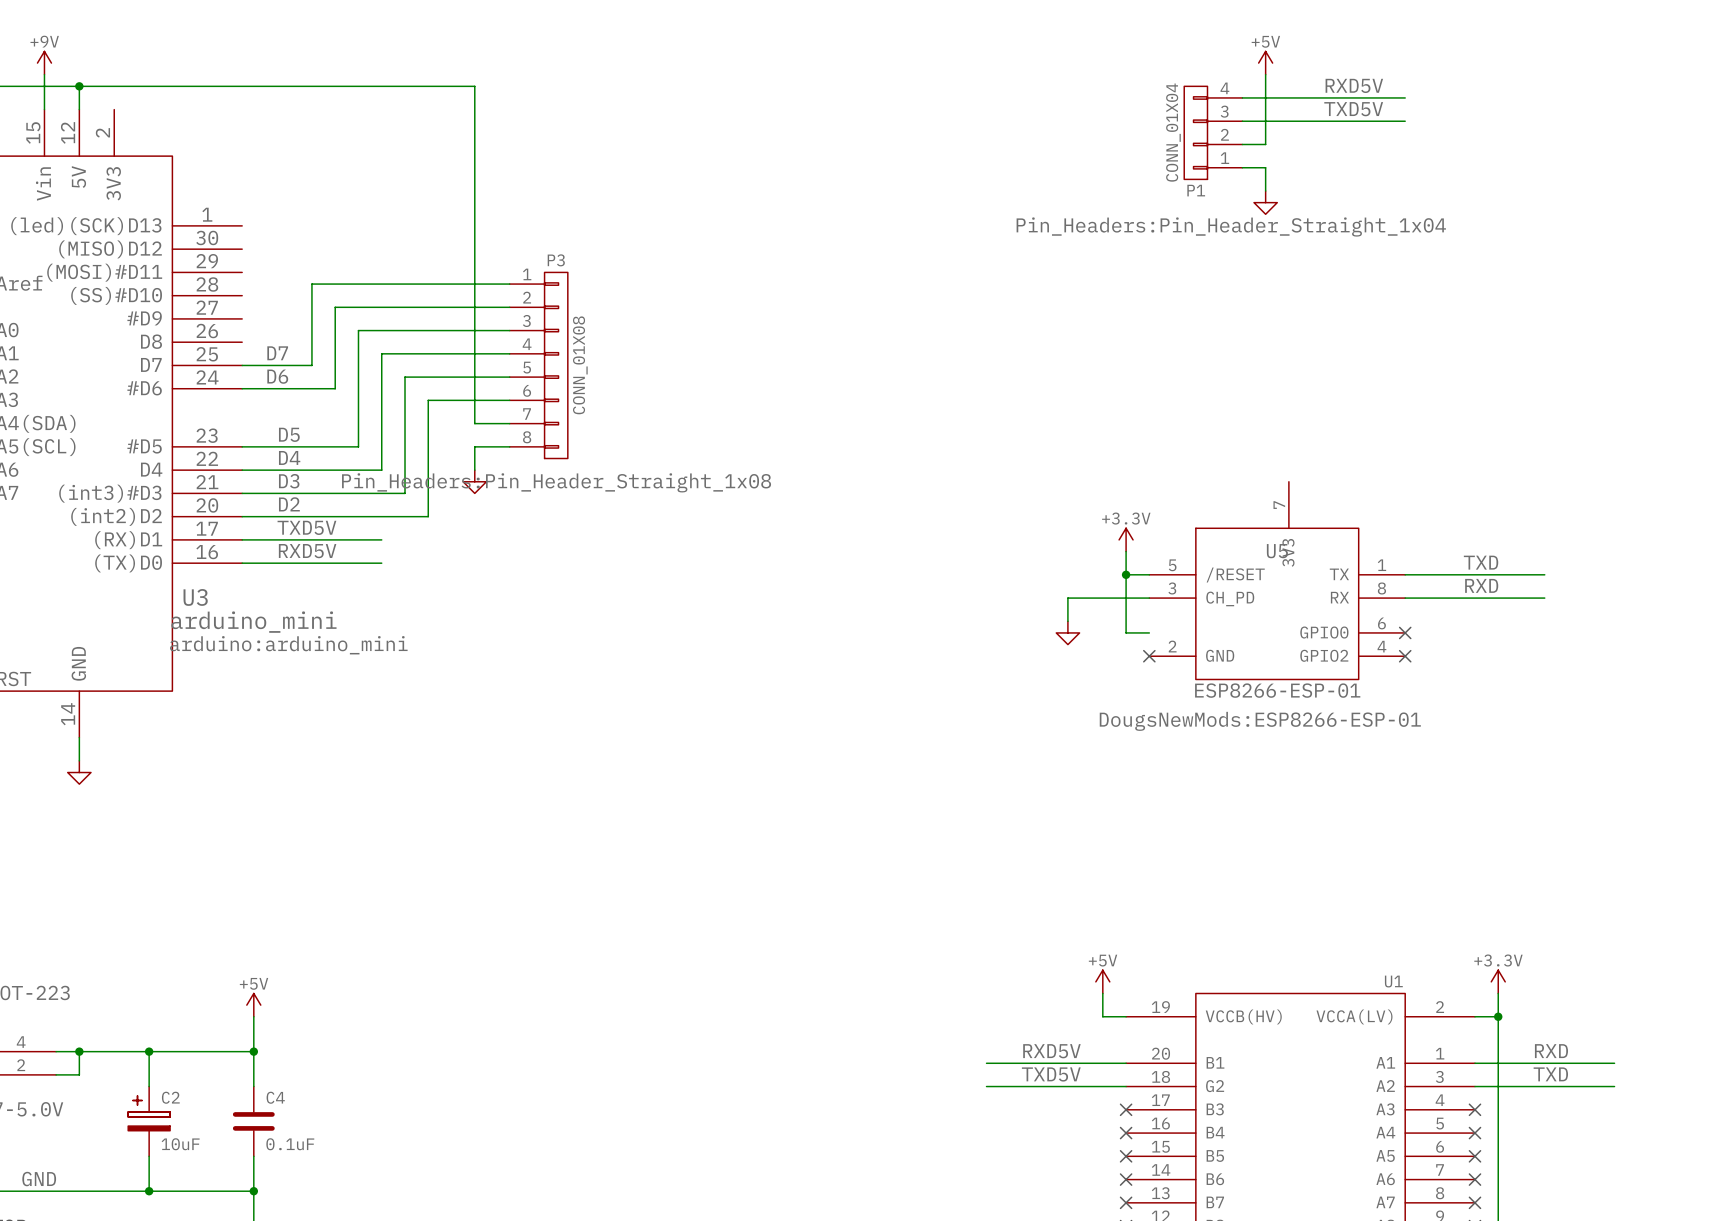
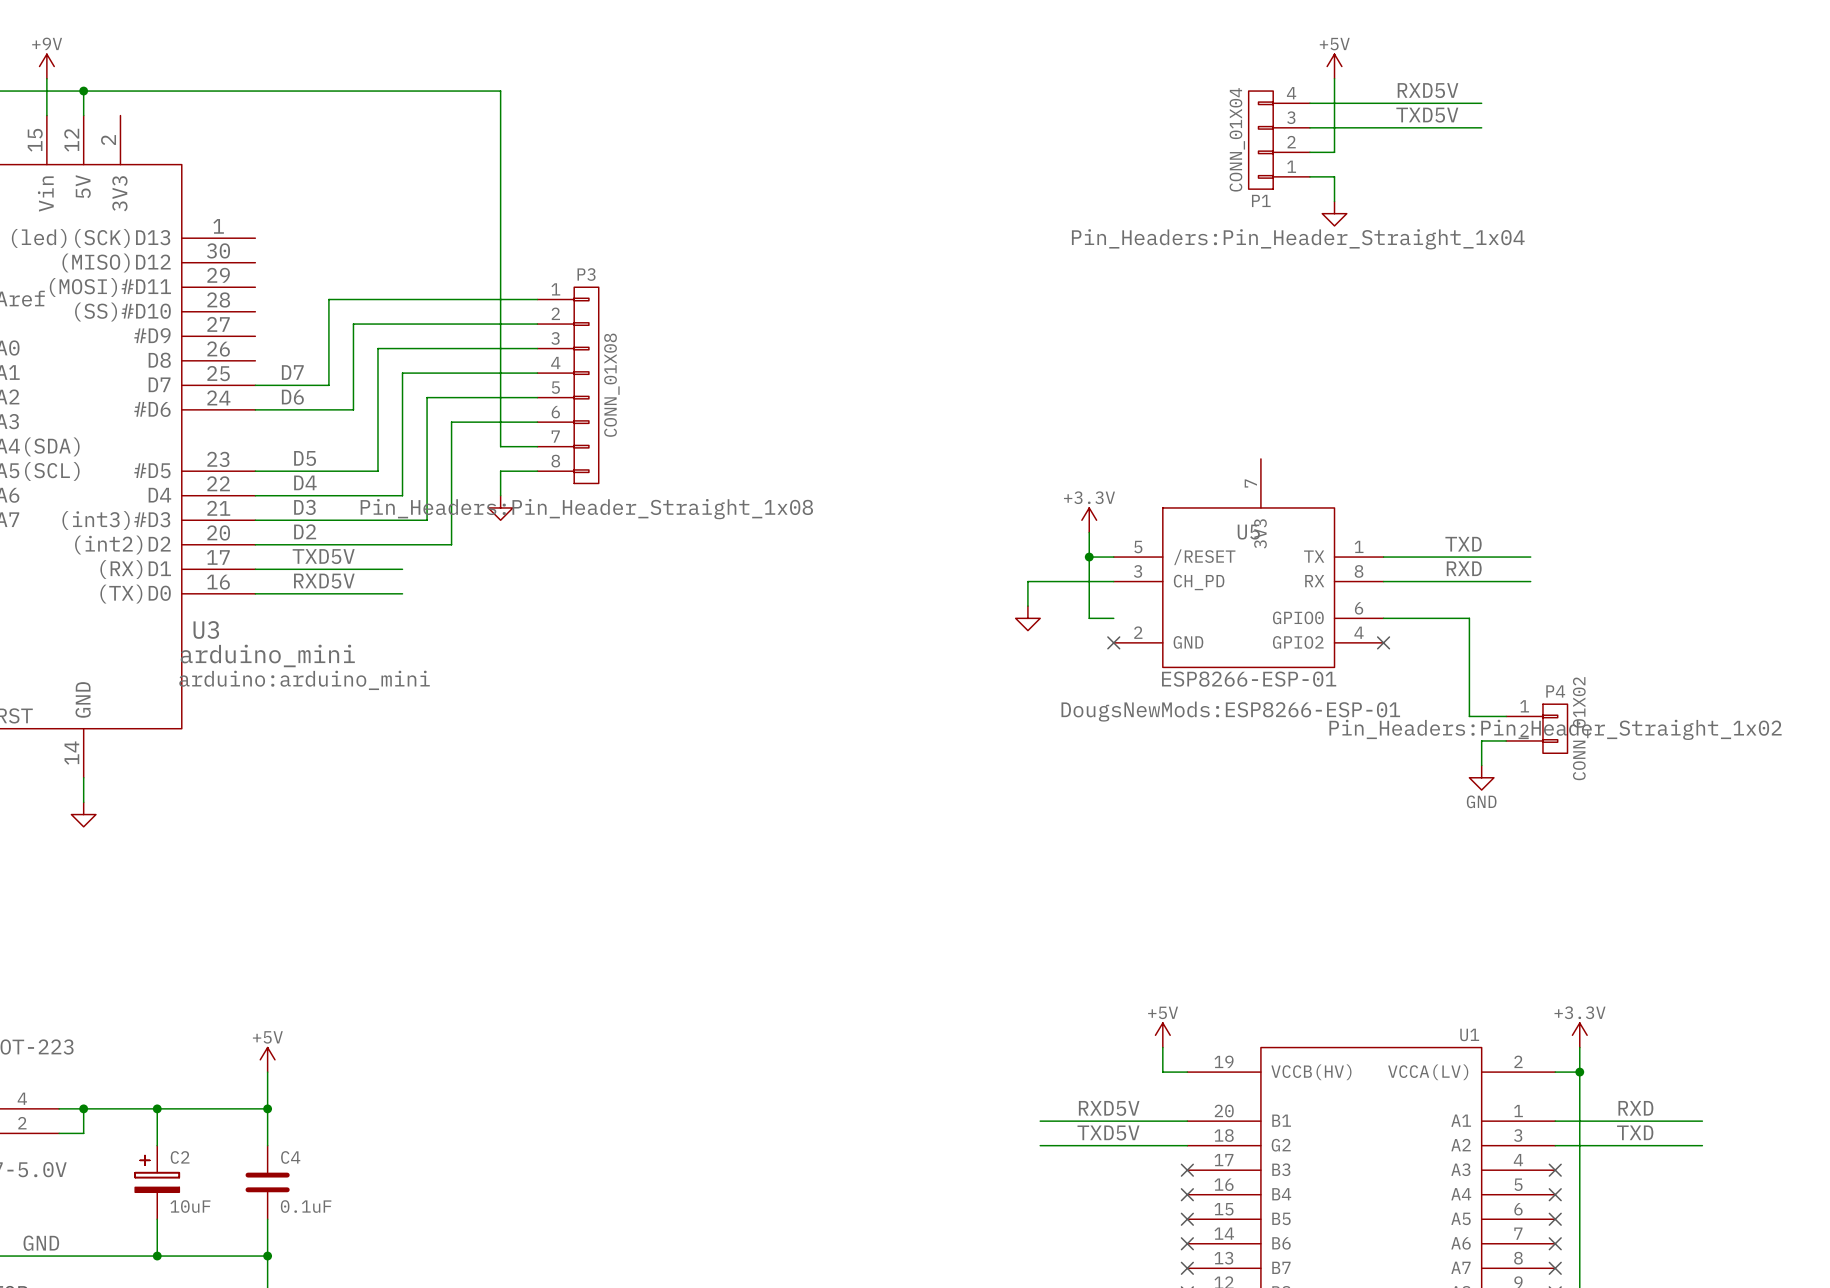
junction: none -> (1089, 557)
power symbol position: +3.3V (1126, 539) -> +3.3V (1089, 520)
wire: (1126, 551) (1126, 632) (1149, 632) -> (1089, 532) (1089, 618) (1113, 618)
label position: TXD (1481, 562) -> TXD (1463, 544)
wire: (1126, 574) (1149, 574) -> (1089, 557) (1113, 557)
junction: (1126, 574) -> none
wire: (1405, 574) (1544, 574) -> (1383, 557) (1530, 557)
U5 position: (1277, 580) -> (1248, 563)
label position: RXD (1481, 585) -> RXD (1464, 568)
wire: none -> (1383, 618) (1469, 618) (1469, 716) (1506, 716)
wire: (1149, 598) (1067, 598) (1067, 621) -> (1113, 581) (1027, 581) (1027, 606)
wire: (1405, 598) (1544, 598) -> (1383, 581) (1530, 581)
no-connect mark: none -> (1113, 642)
no-connect mark: none -> (1383, 642)
power symbol position: (1067, 632) -> (1027, 618)
no-connect mark: (1405, 632) -> none
no-connect mark: (1149, 656) -> none
no-connect mark: (1405, 656) -> none
P4: none -> CONN_01X02 (1536, 728)
wire: none -> (1506, 740) (1481, 740) (1481, 765)
power symbol: none -> GND (1481, 777)

